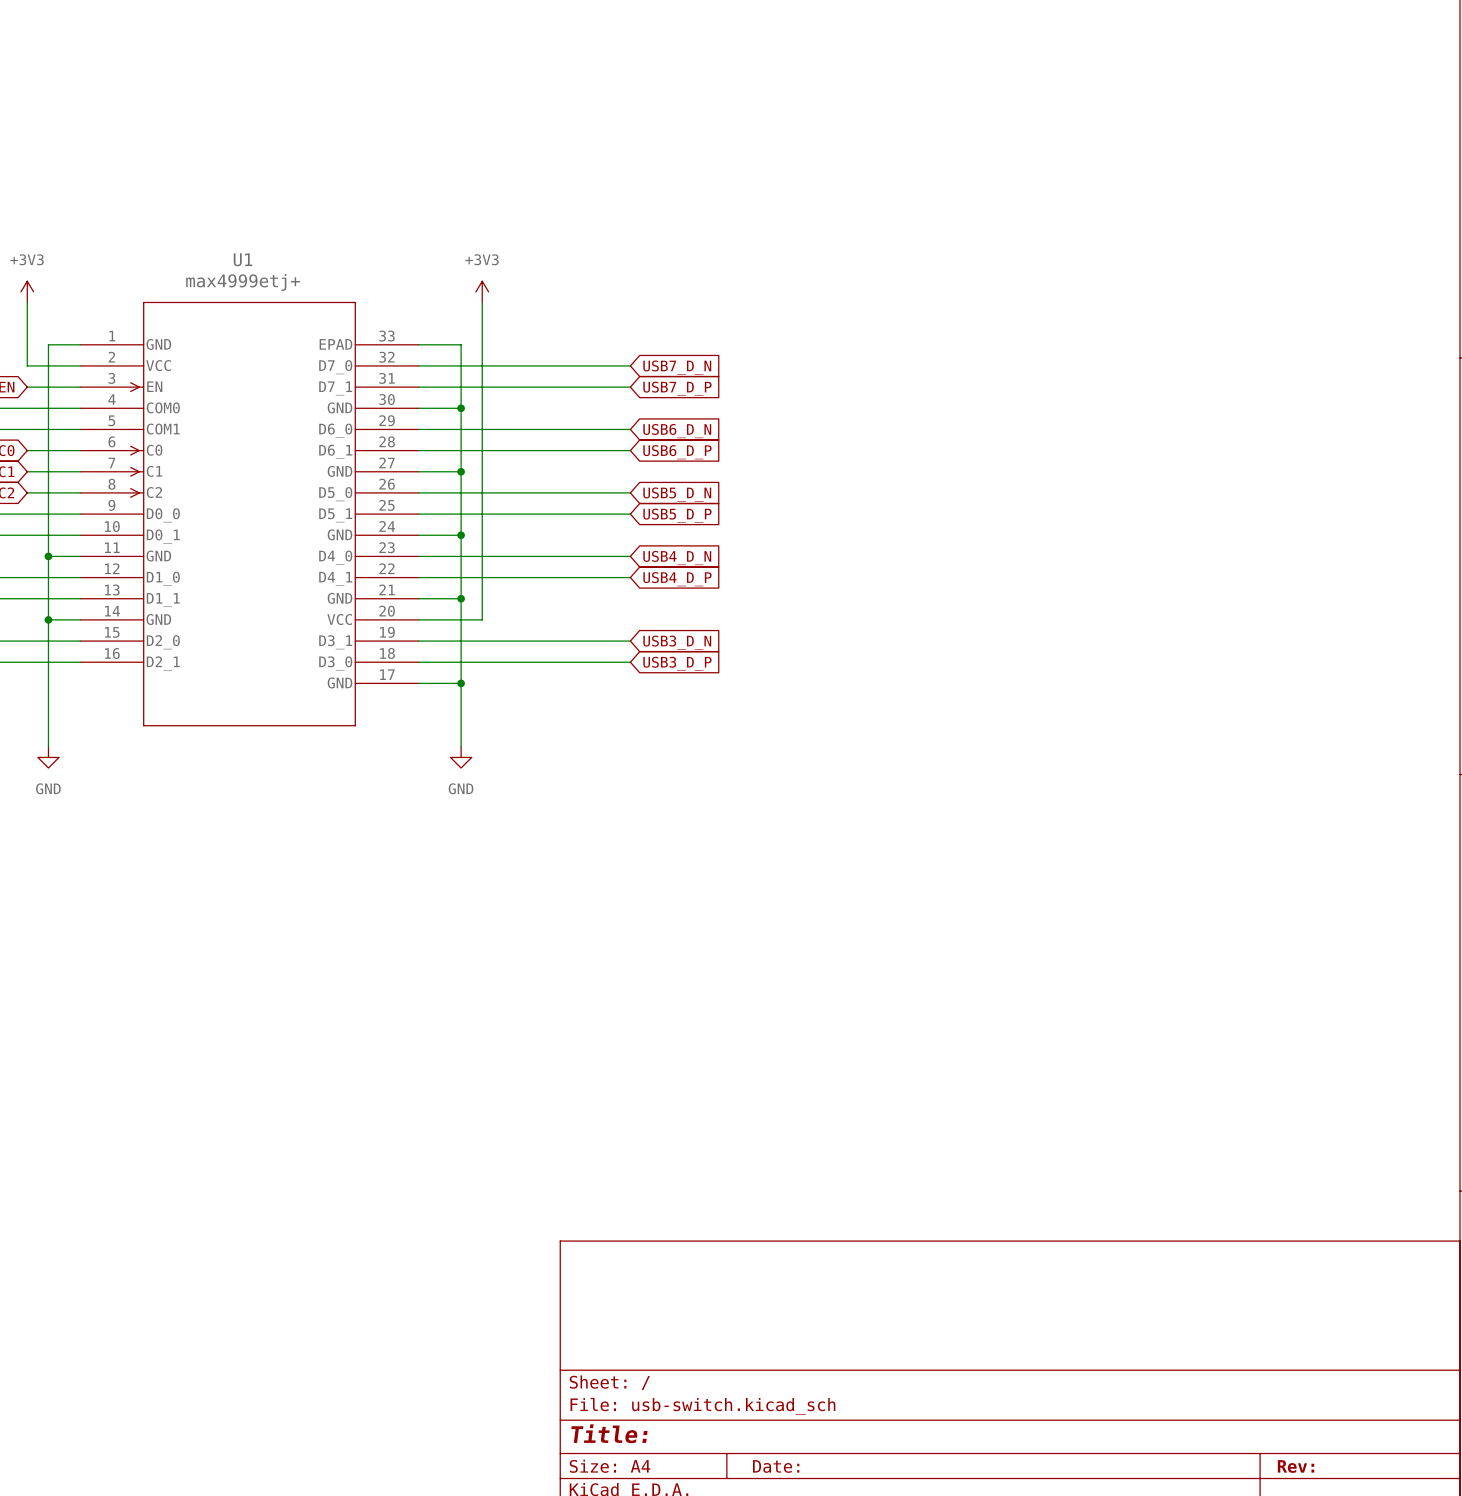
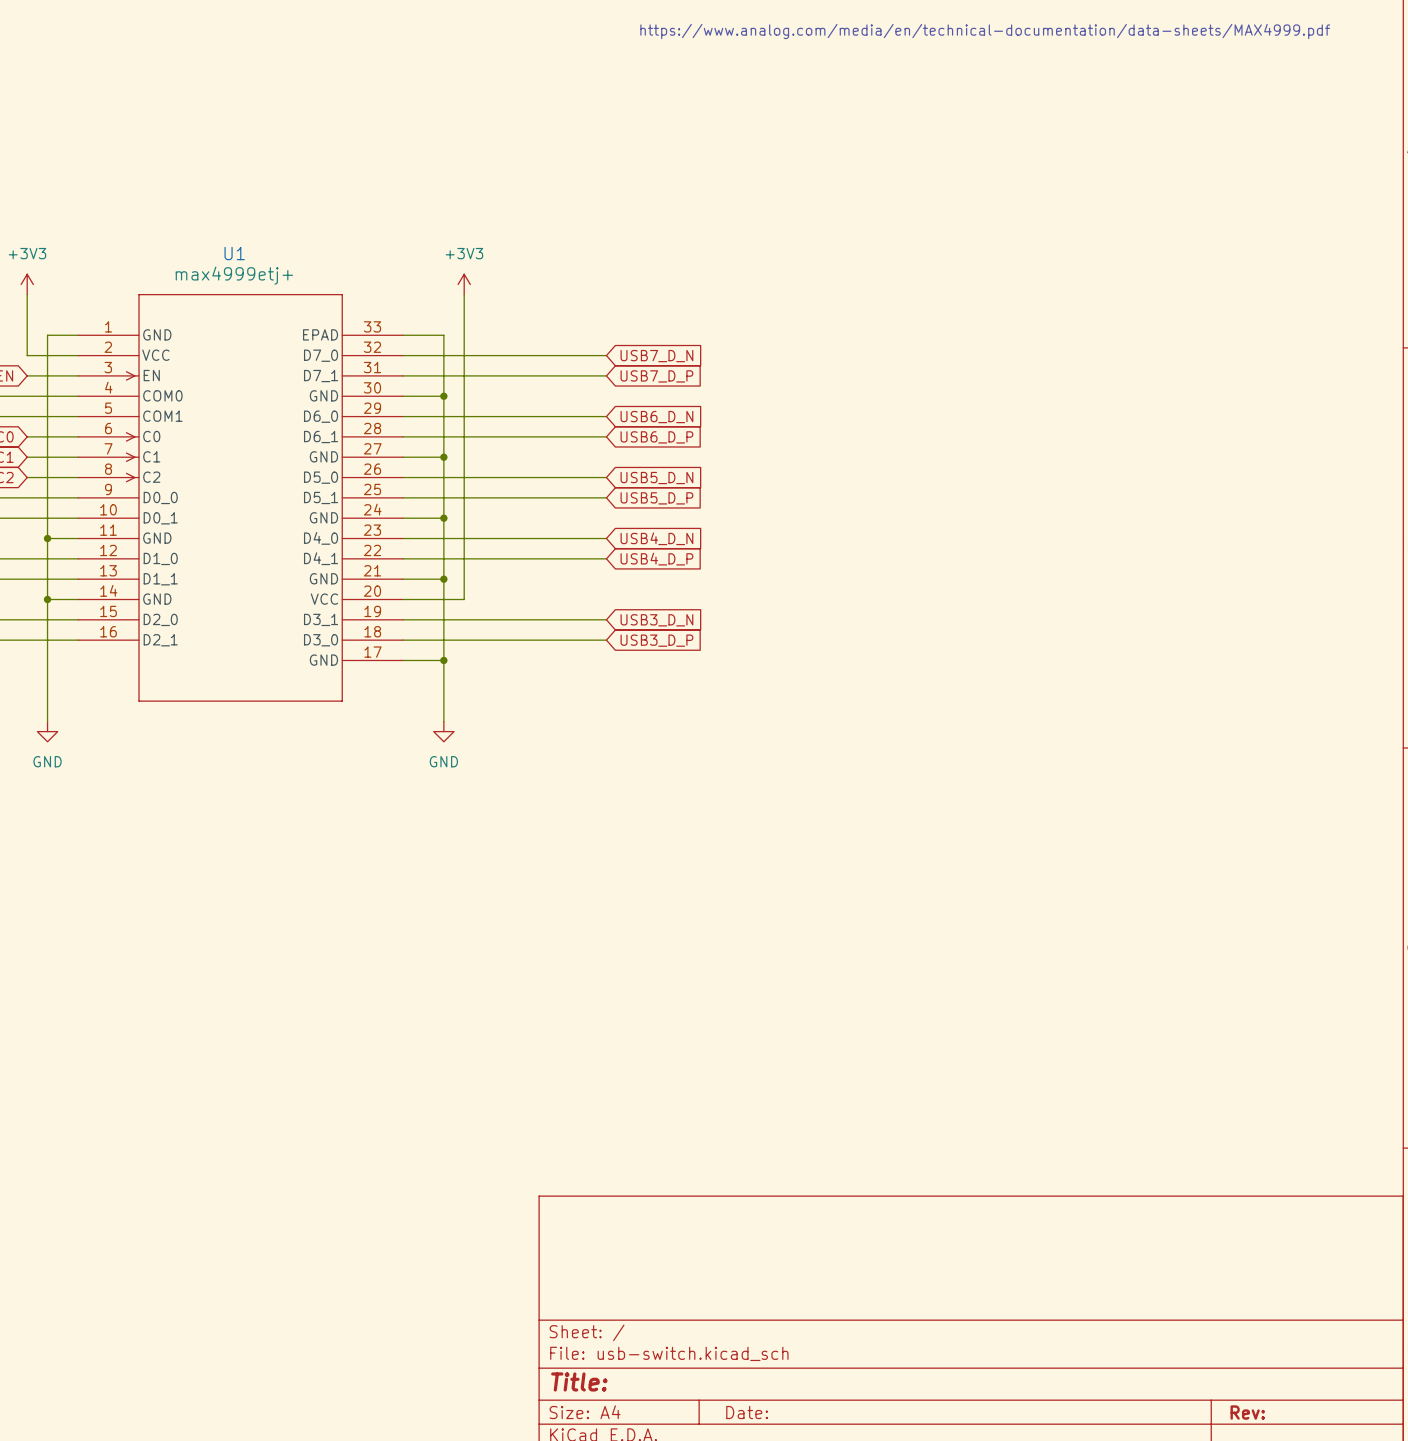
text: none -> https://www.analog.com/media/en/technical-documentation/data-sheets/MAX4999.pdf (985, 31)

